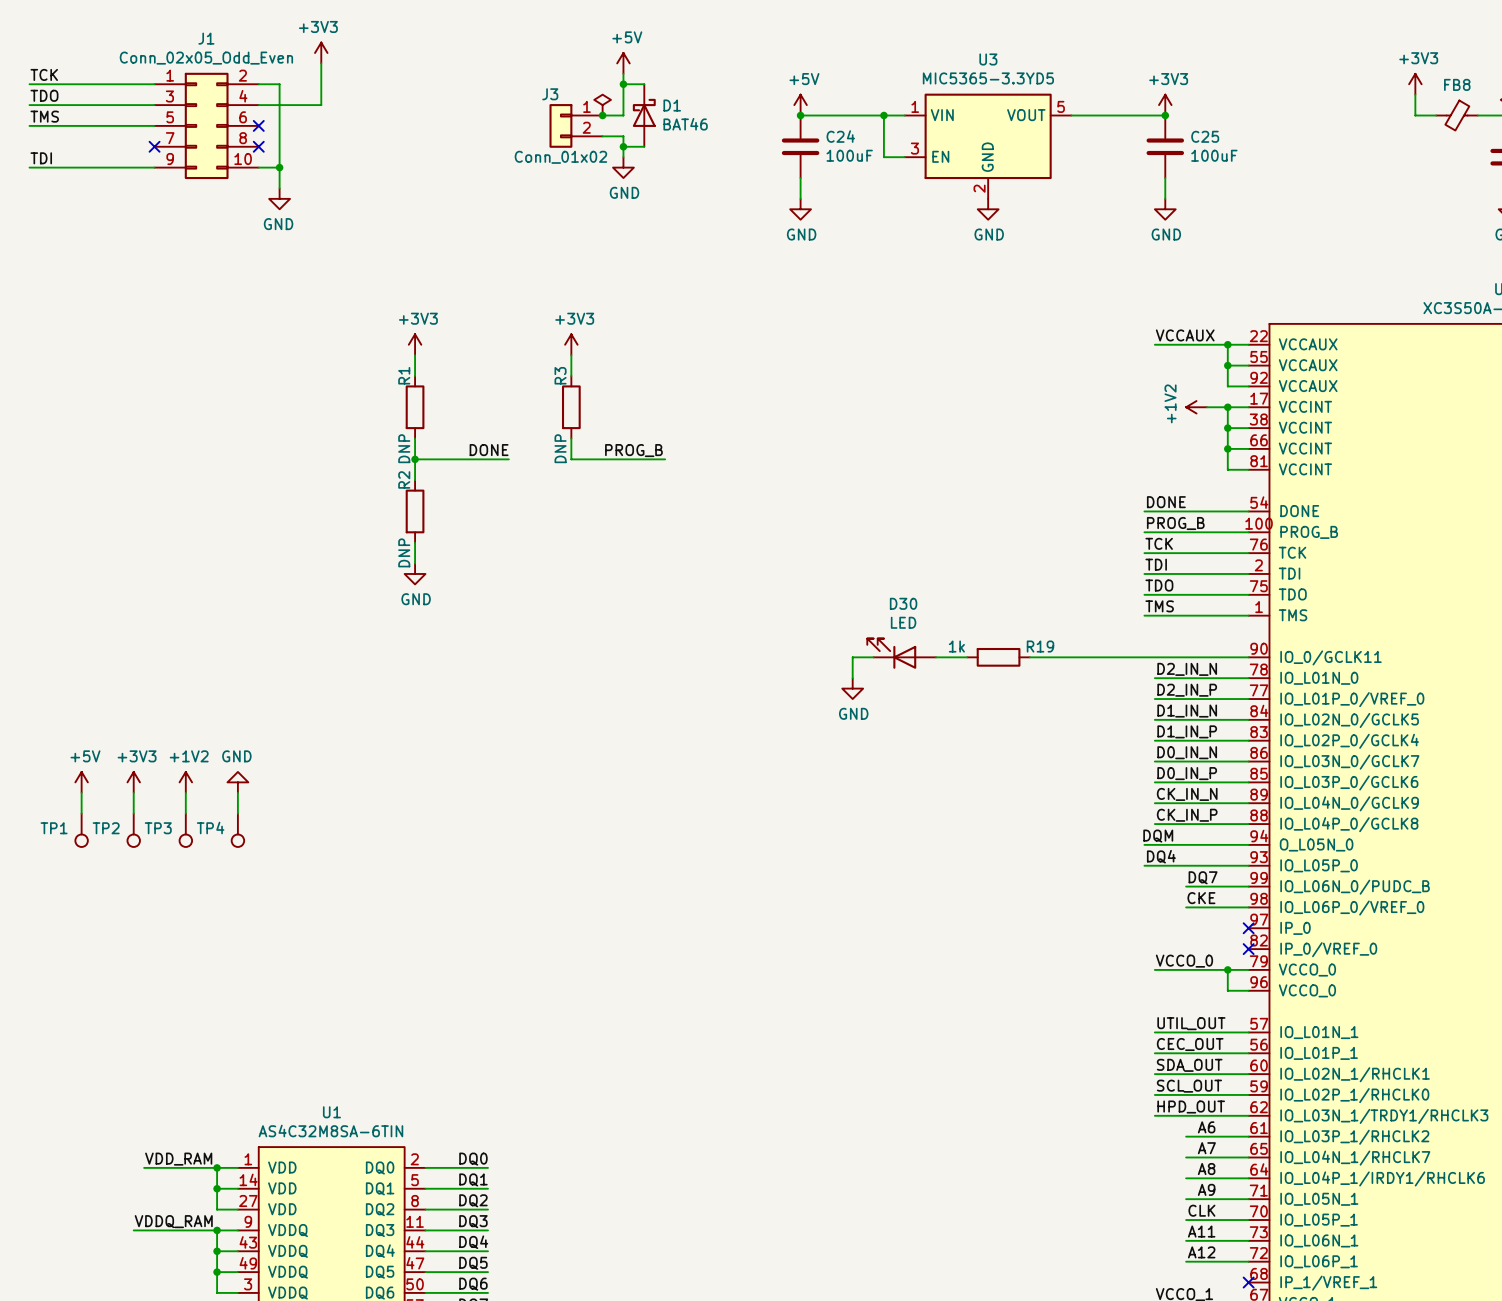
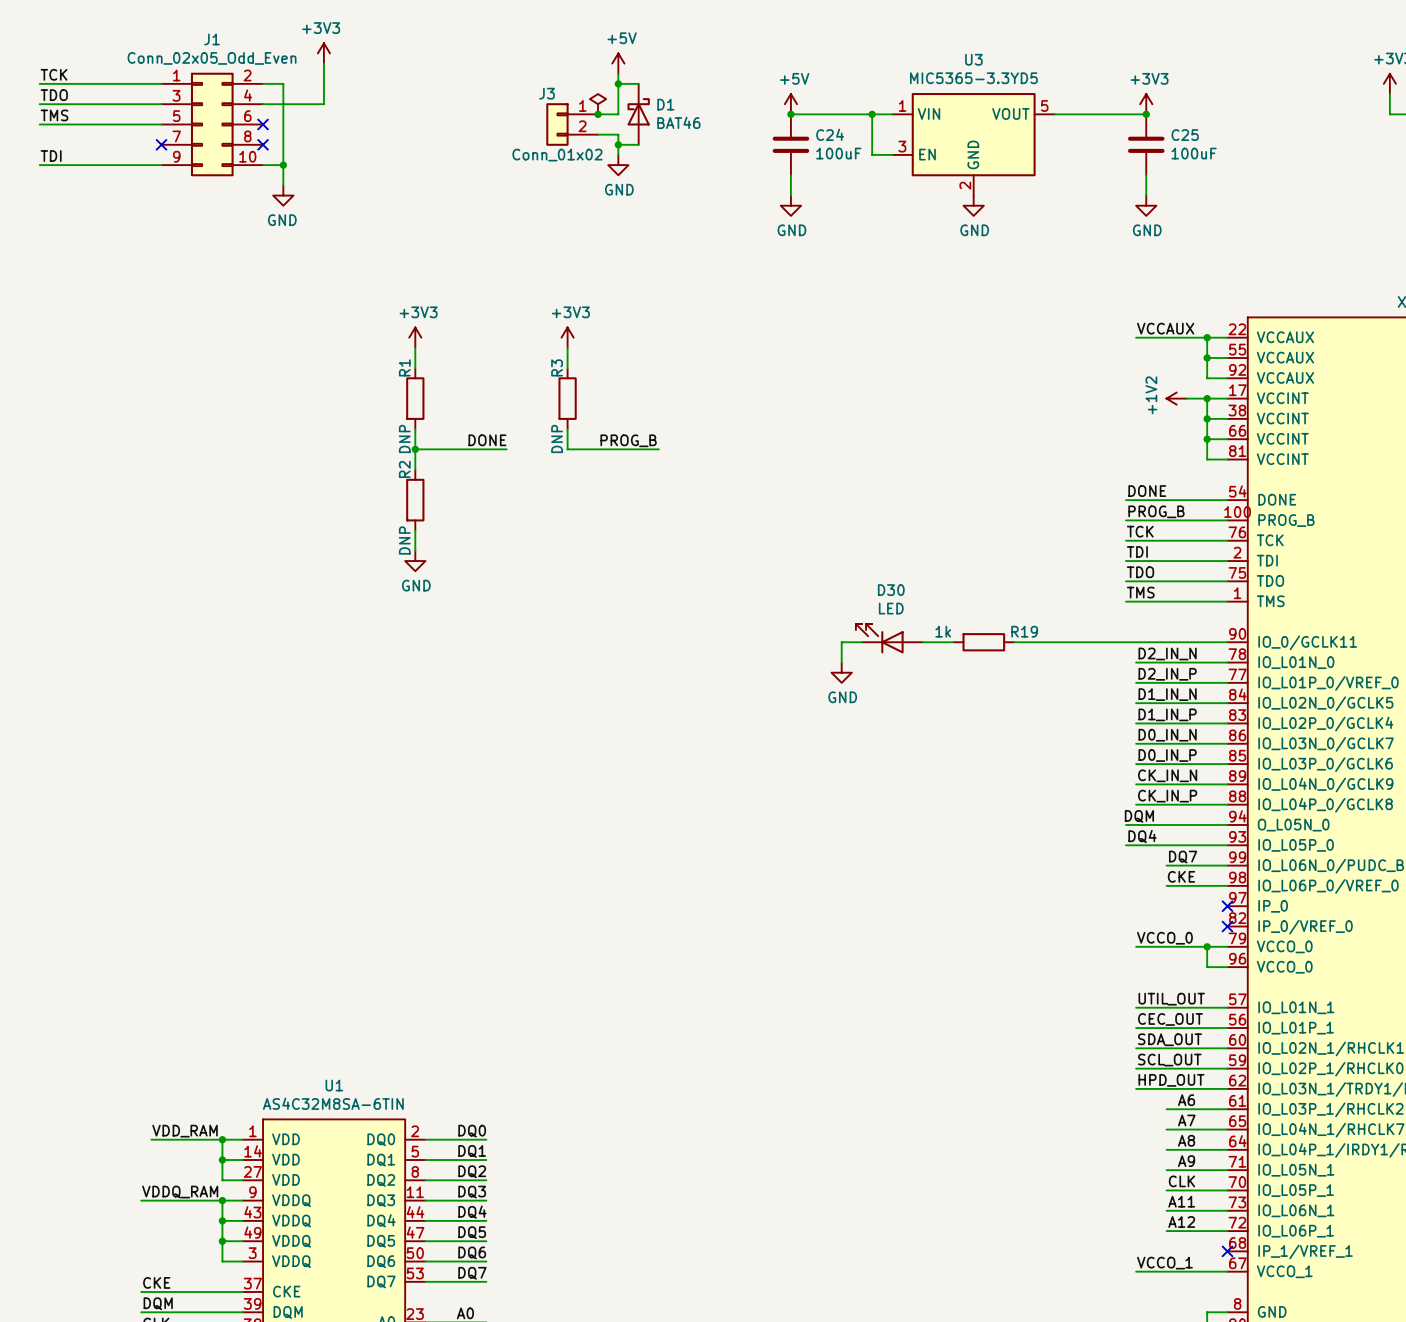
power symbol: +5V (81, 782) -> none
power symbol: +3V3 (133, 782) -> none
power symbol: +1V2 (185, 782) -> none
power symbol: GND (237, 782) -> none
wire: (81, 792) (81, 813) -> none
wire: (133, 792) (133, 813) -> none
wire: (185, 792) (185, 813) -> none
wire: (237, 792) (237, 813) -> none
TP1: (81, 830) -> none
TP2: (133, 830) -> none
TP3: (185, 830) -> none
TP4: (237, 830) -> none

